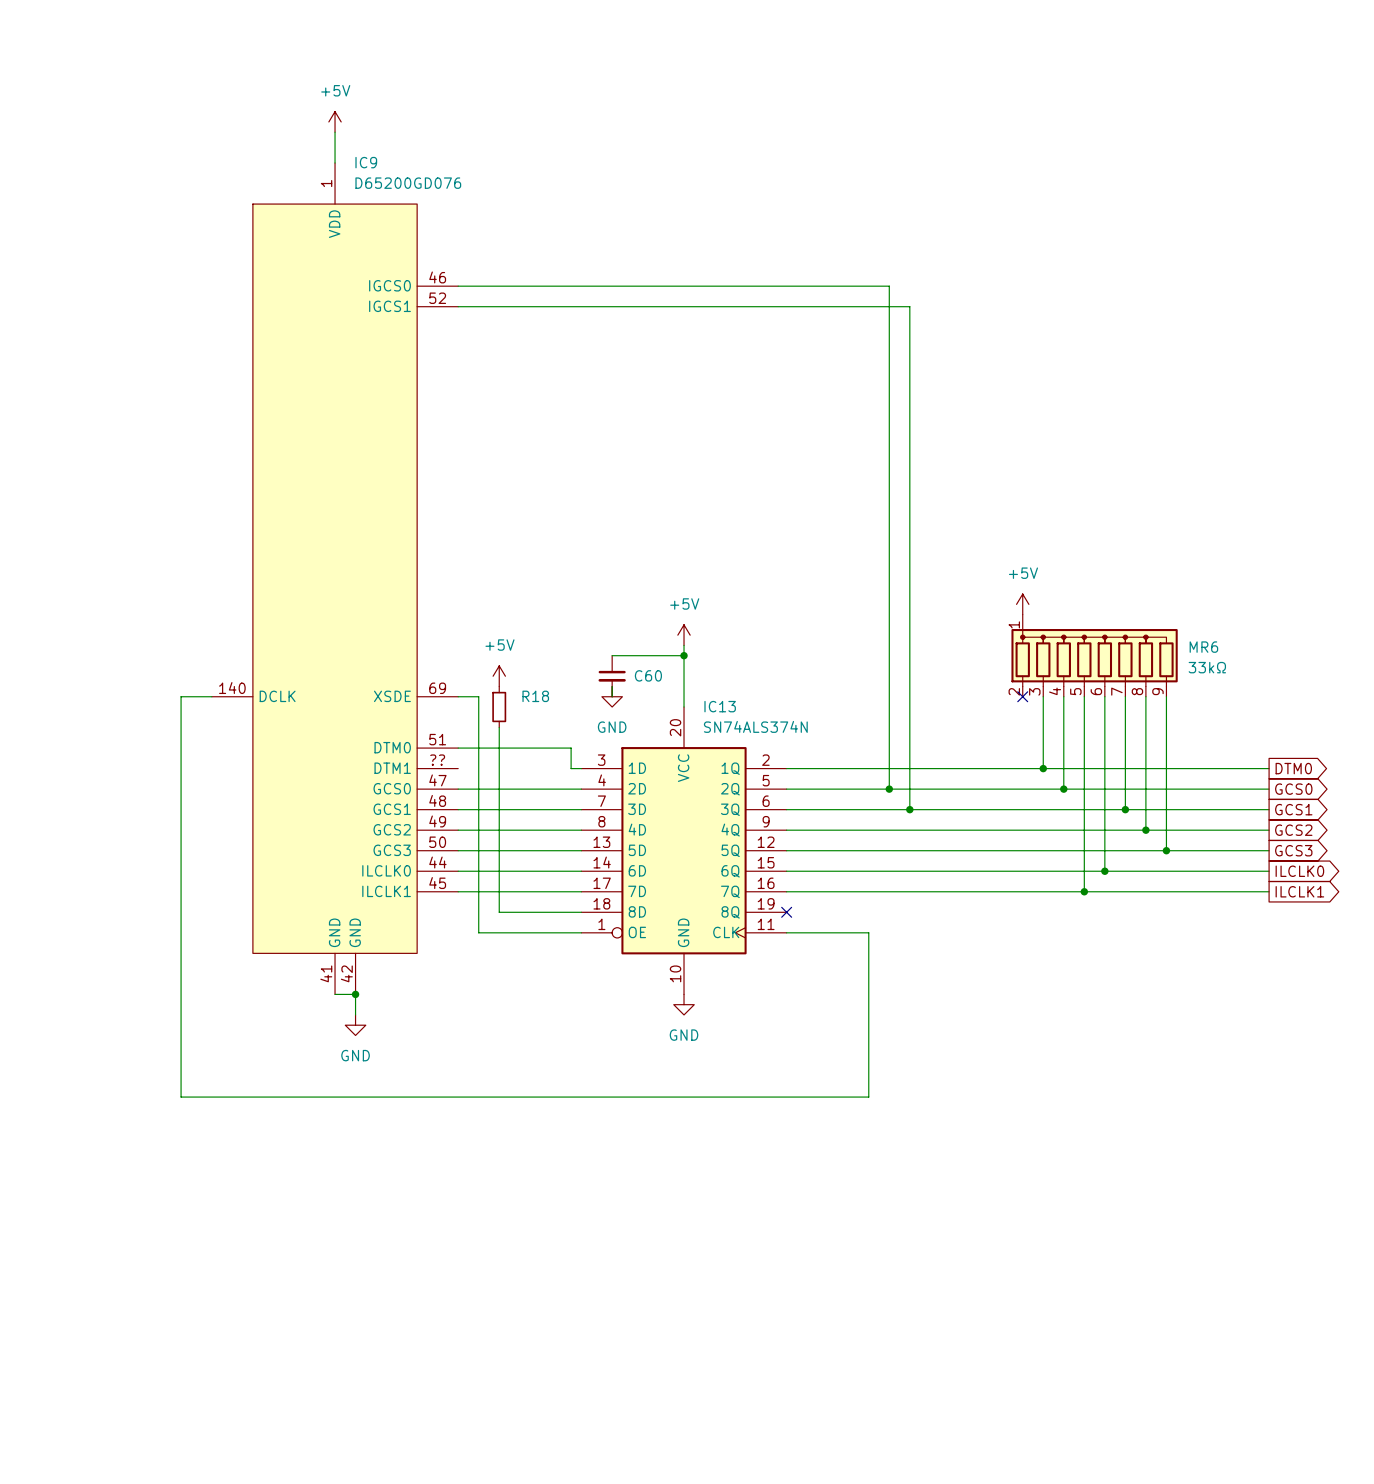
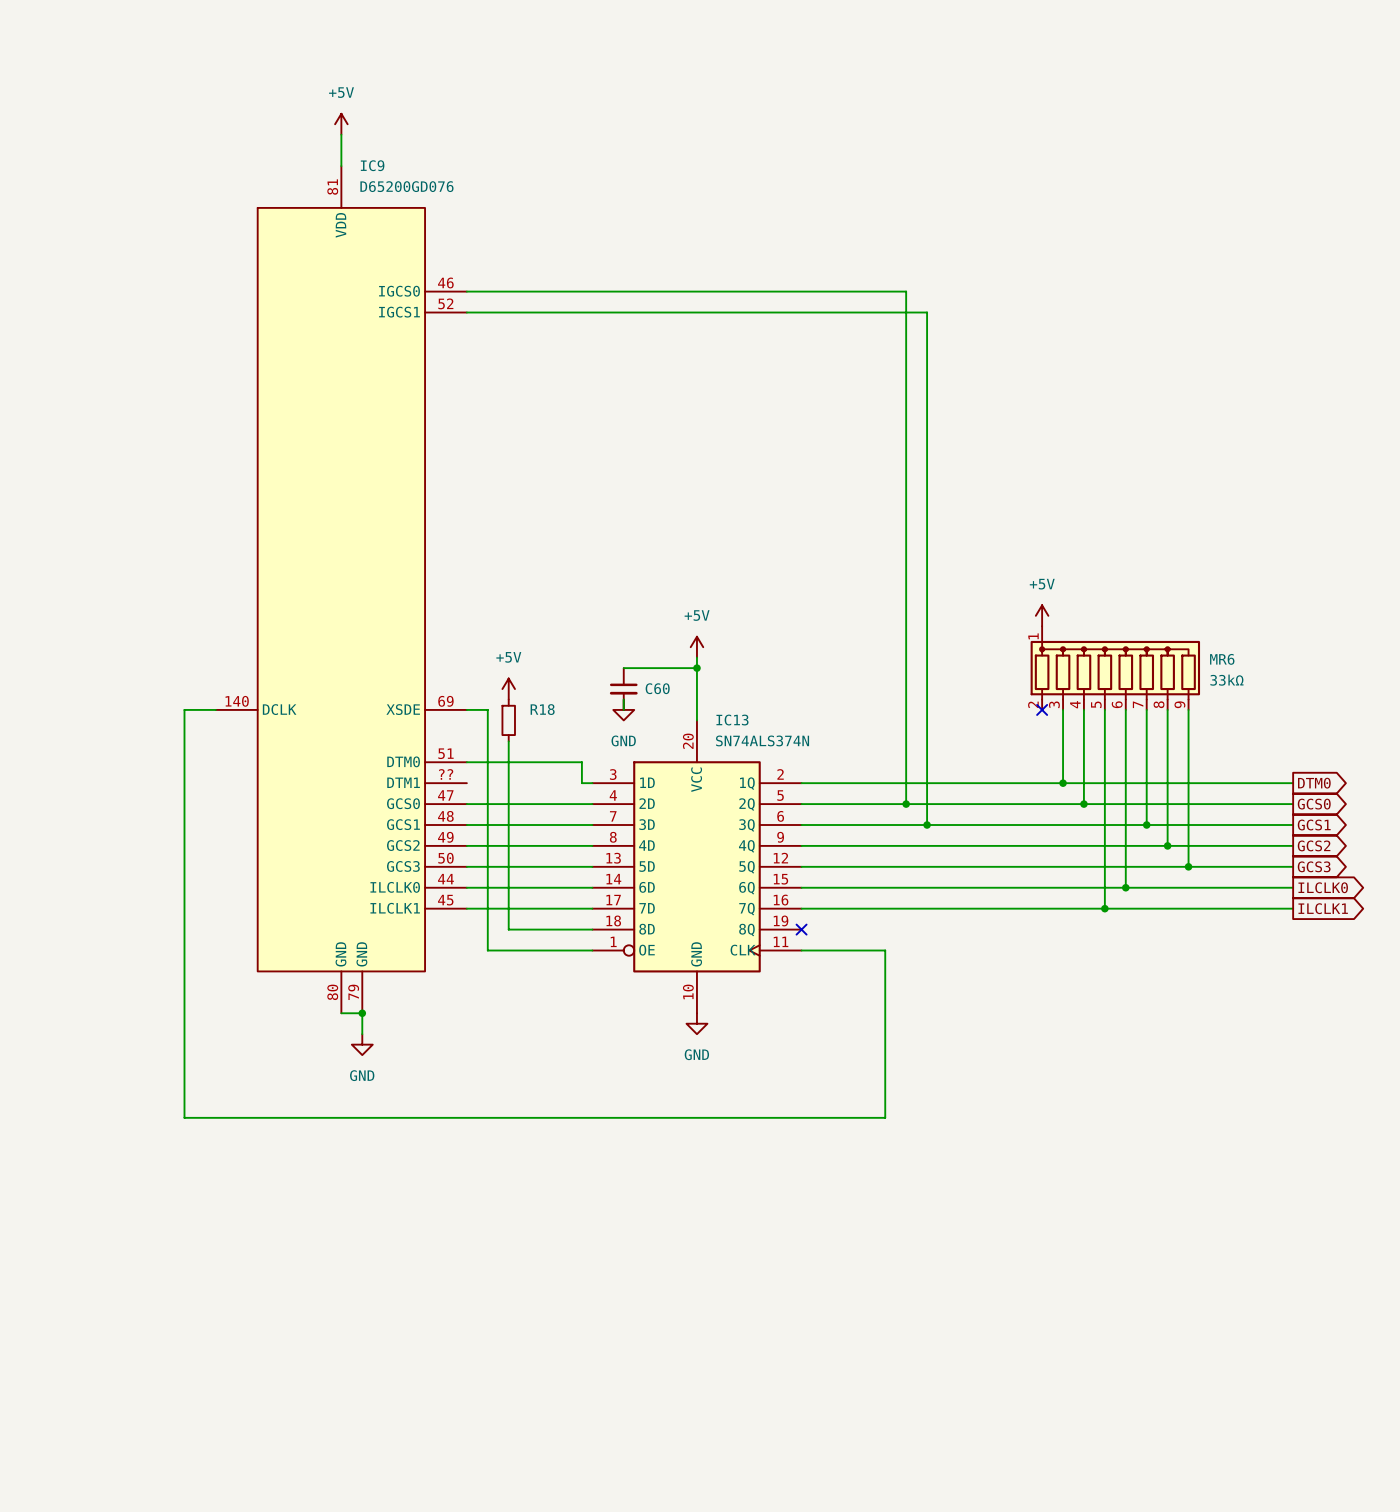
IC9 pin number: 1 (326, 183) -> 81 (332, 187)
IC9 pin number: 41 (326, 973) -> 80 (332, 992)
IC9 pin number: 42 (346, 973) -> 79 (353, 992)

